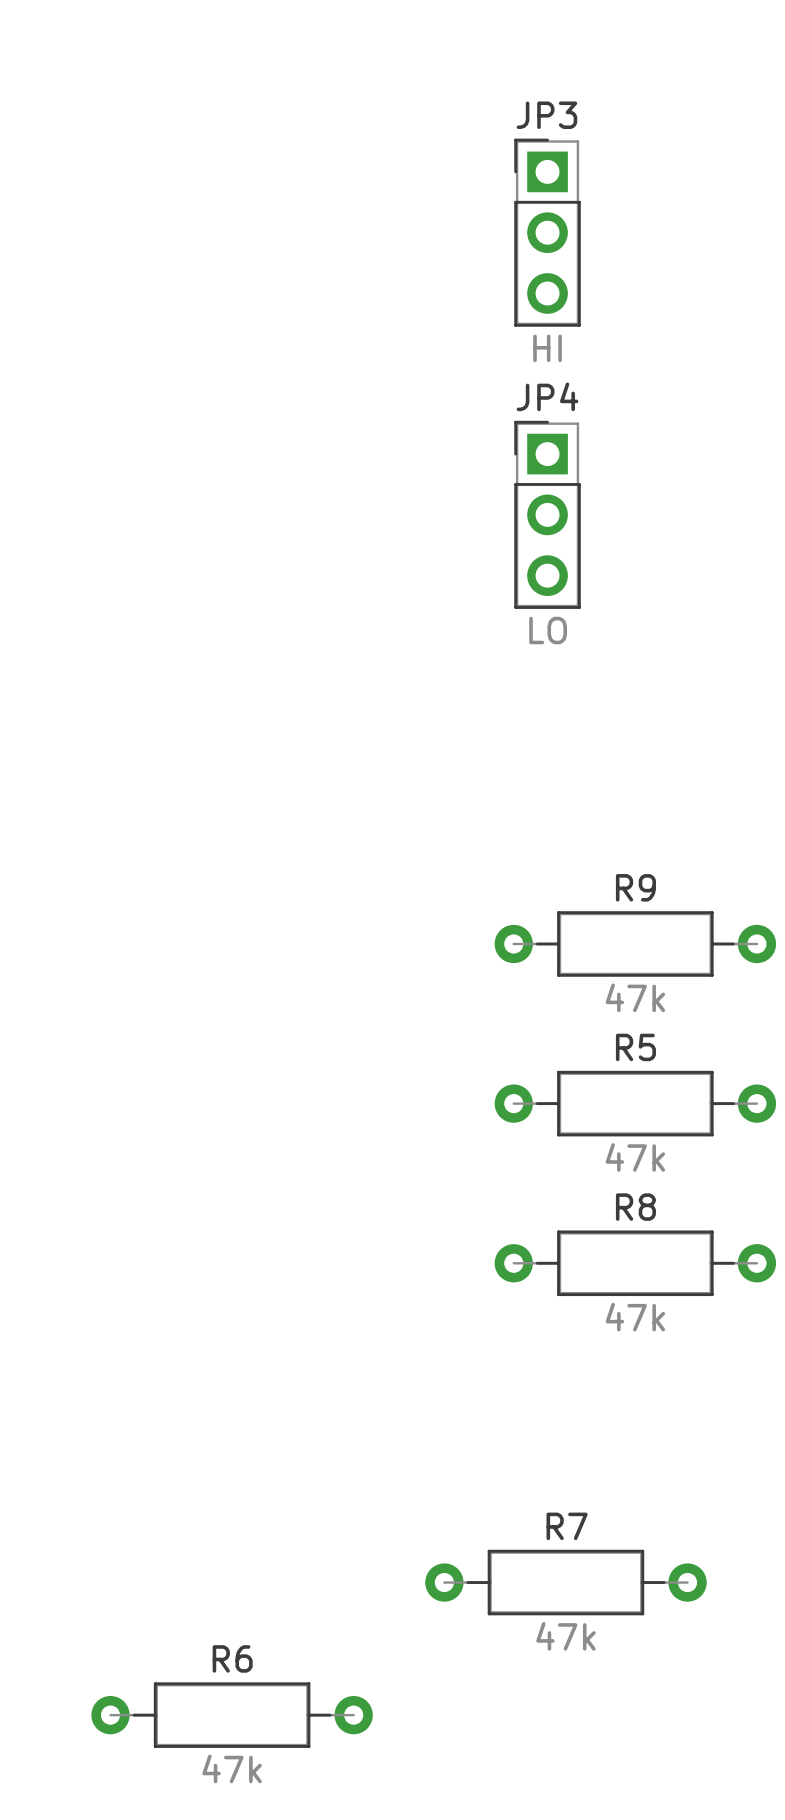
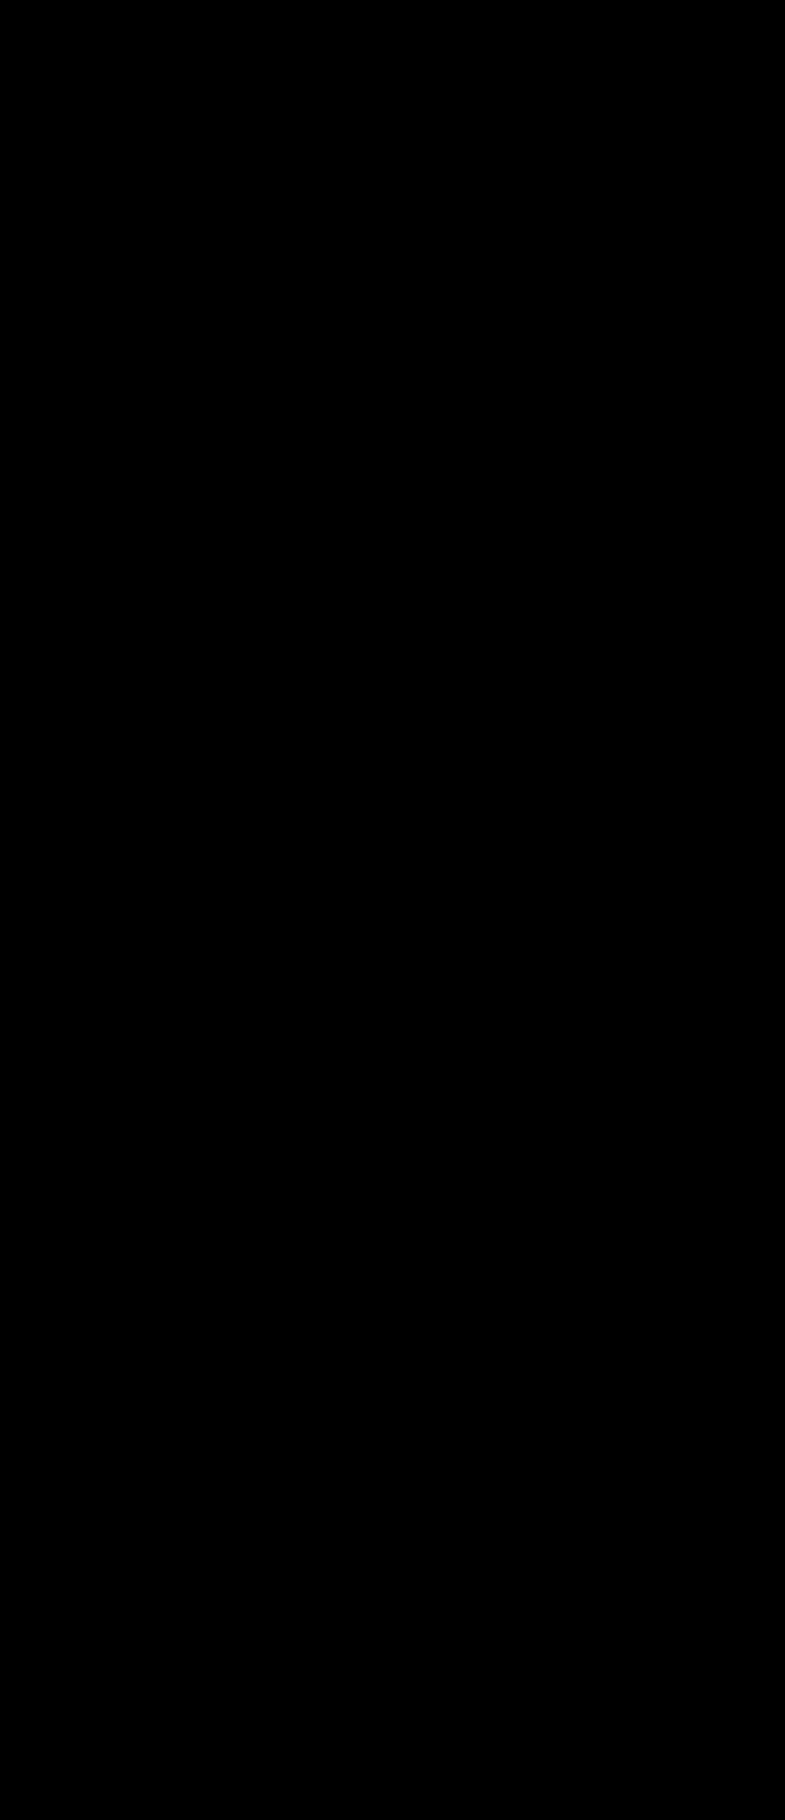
JP3: HI (547, 232) -> none
JP4: LO (547, 514) -> none
R9: 47k (635, 943) -> none
R5: 47k (635, 1103) -> none
R8: 47k (635, 1263) -> none
R7: 47k (565, 1582) -> none
R6: 47k (232, 1715) -> none

